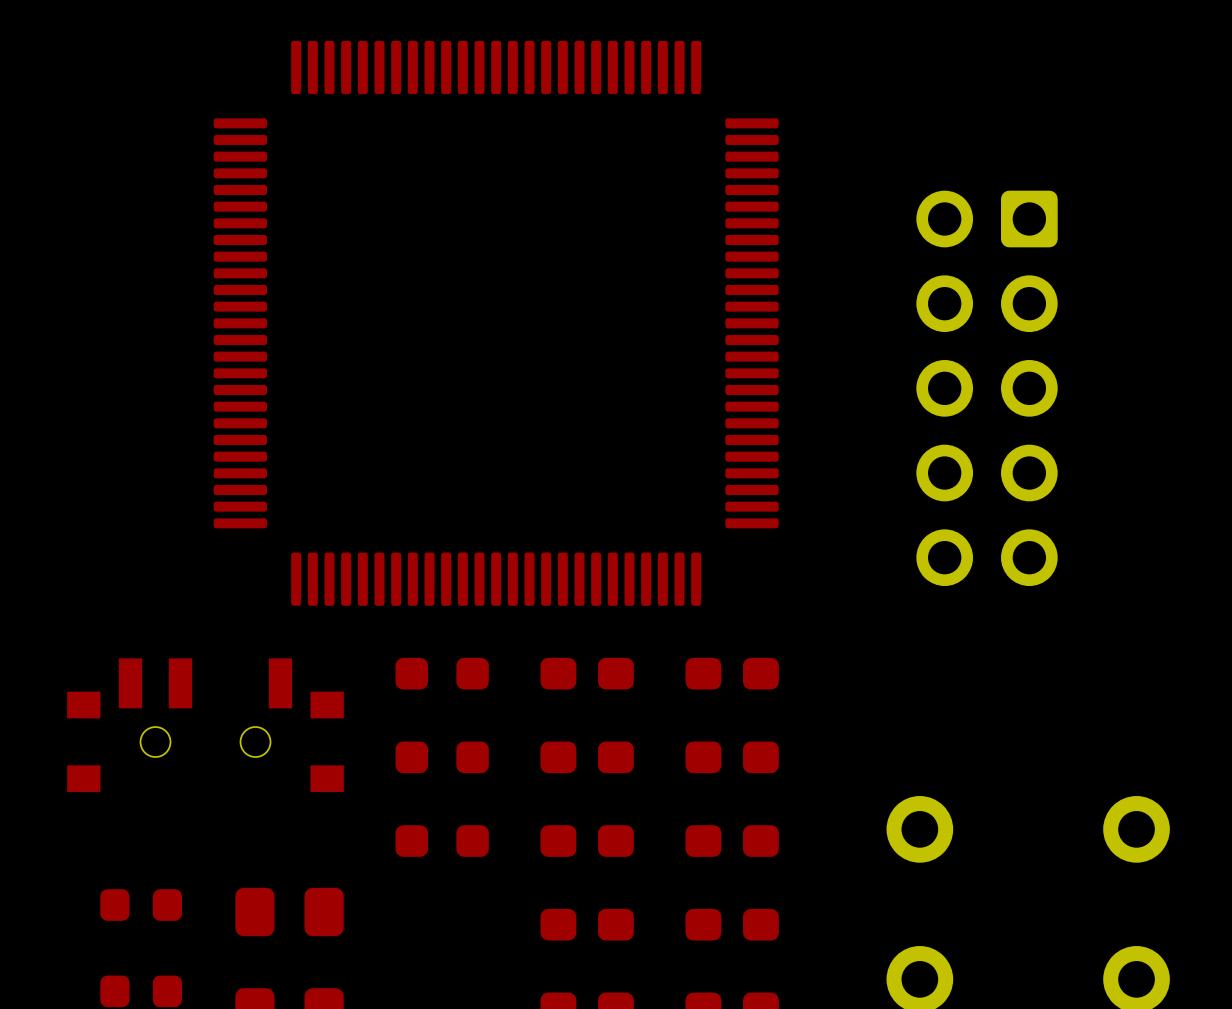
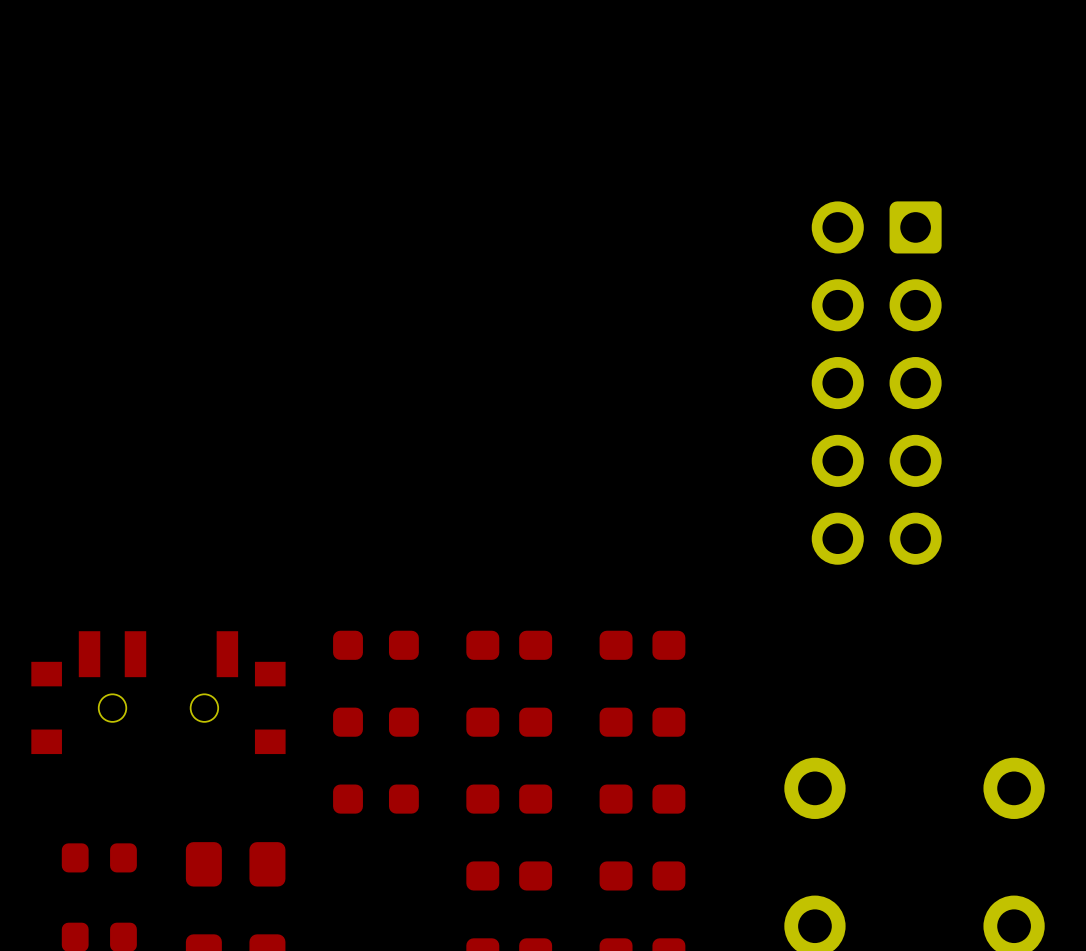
part: (496, 323) -> none

